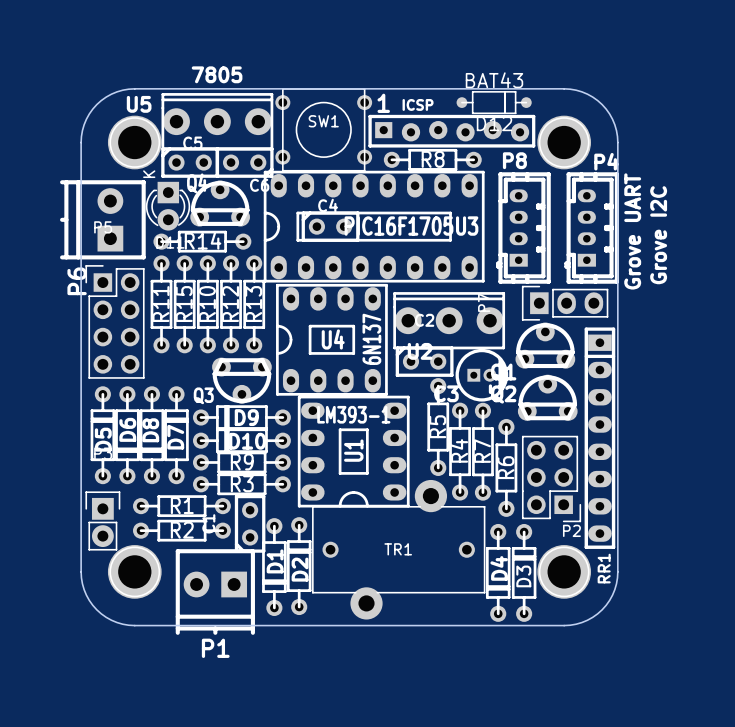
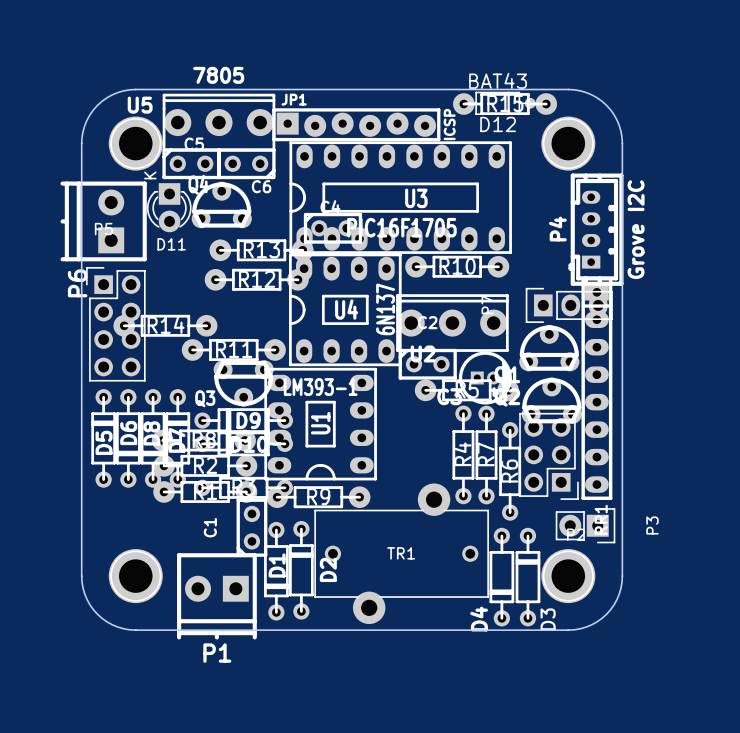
text: 1 (383, 103) -> none
JP1: none -> ICSP (356, 124)
SW1: (323, 129) -> none
part: ICSP (451, 131) -> none
R8 footprint: [383, 148, 482, 171] -> [151, 429, 256, 452]
P4 name rotation: 0° (606, 161) -> 90° counterclockwise (557, 229)
P4 name position: P4 (606, 161) -> P4 (557, 229)
U3 position: (374, 226) -> (400, 197)
U3 name position: U3 (467, 226) -> U3 (416, 198)
P8: Grove UART (523, 228) -> none
R14 footprint: [153, 230, 252, 253] -> [113, 314, 218, 337]
P4 value position: Grove I2C (658, 235) -> Grove I2C (636, 229)
R11 footprint: [150, 255, 173, 354] -> [181, 338, 286, 361]
R15 footprint: [173, 255, 196, 354] -> [453, 93, 558, 116]
R10 footprint: [196, 255, 219, 354] -> [405, 255, 510, 278]
R12 footprint: [220, 255, 242, 354] -> [204, 268, 309, 291]
R13 footprint: [243, 255, 266, 354] -> [209, 239, 314, 262]
U4 position: (331, 339) -> (345, 309)
R5 footprint: [427, 378, 450, 477] -> [414, 379, 519, 402]
RR1 position: (599, 438) -> (596, 388)
R9 footprint: [192, 451, 291, 474] -> [266, 486, 371, 509]
U1 position: (353, 451) -> (320, 424)
P2 position: (551, 478) -> (548, 456)
R1 footprint: [133, 495, 231, 518] -> [153, 480, 258, 503]
R2 footprint: [133, 519, 231, 542] -> [153, 454, 258, 477]
P3 rotation: 0° (102, 520) -> 90° clockwise (585, 525)
P3 position: (102, 520) -> (585, 525)
D4 name position: D4 (499, 568) -> D4 (479, 619)
D2 name position: D2 (300, 569) -> D2 (328, 569)
D3 name position: D3 (523, 576) -> D3 (548, 619)

